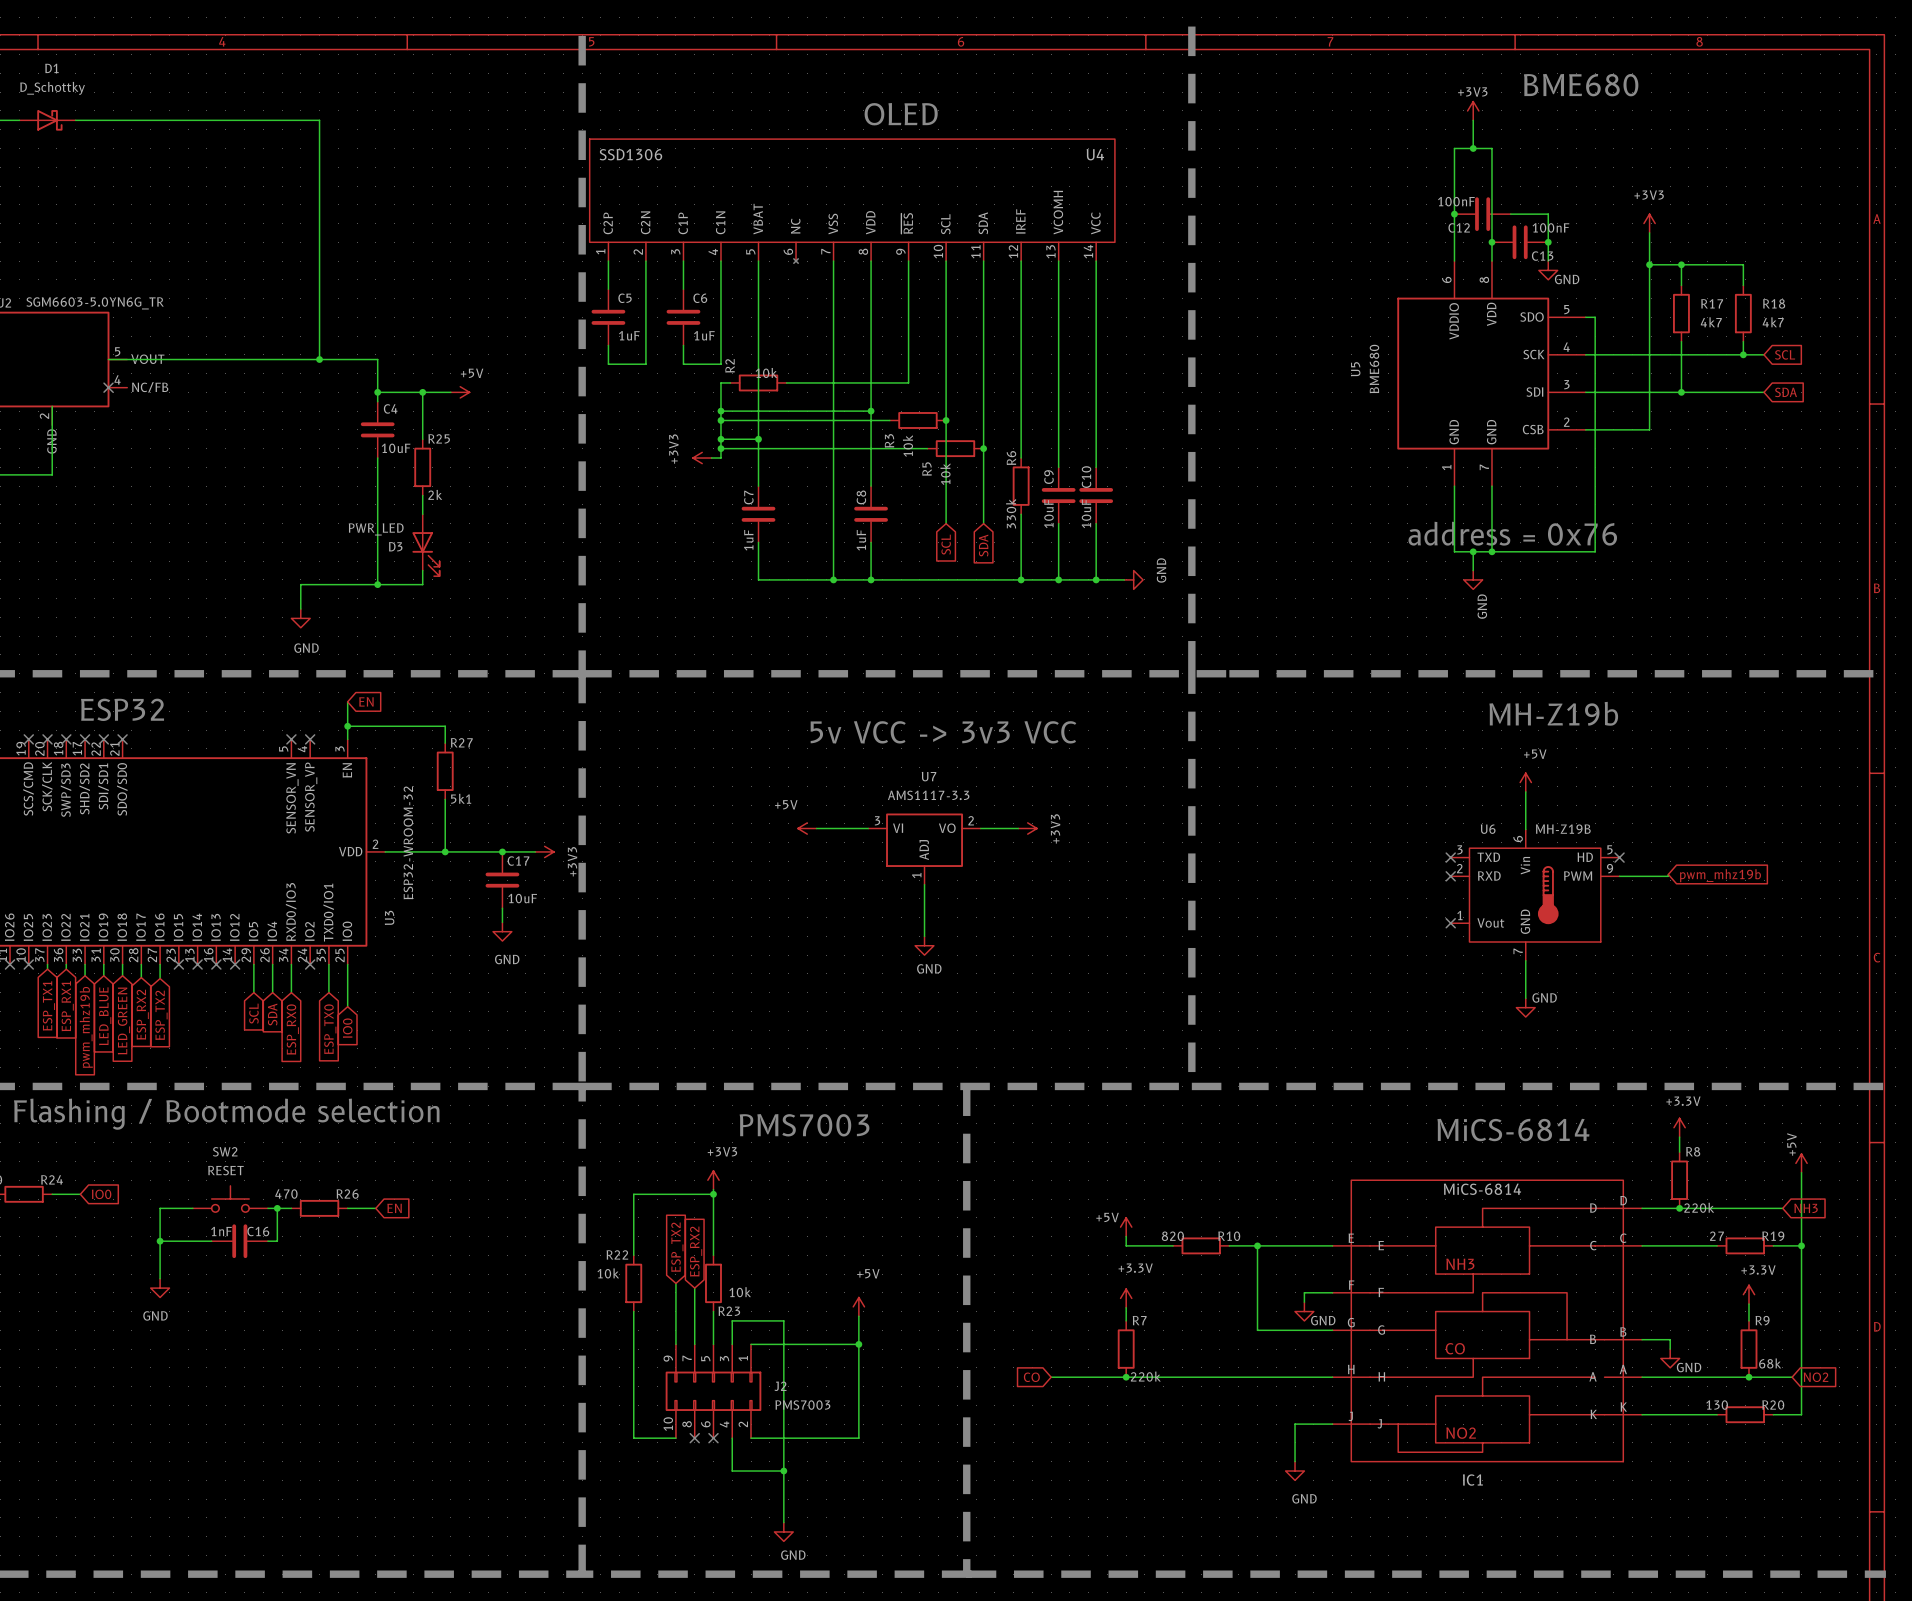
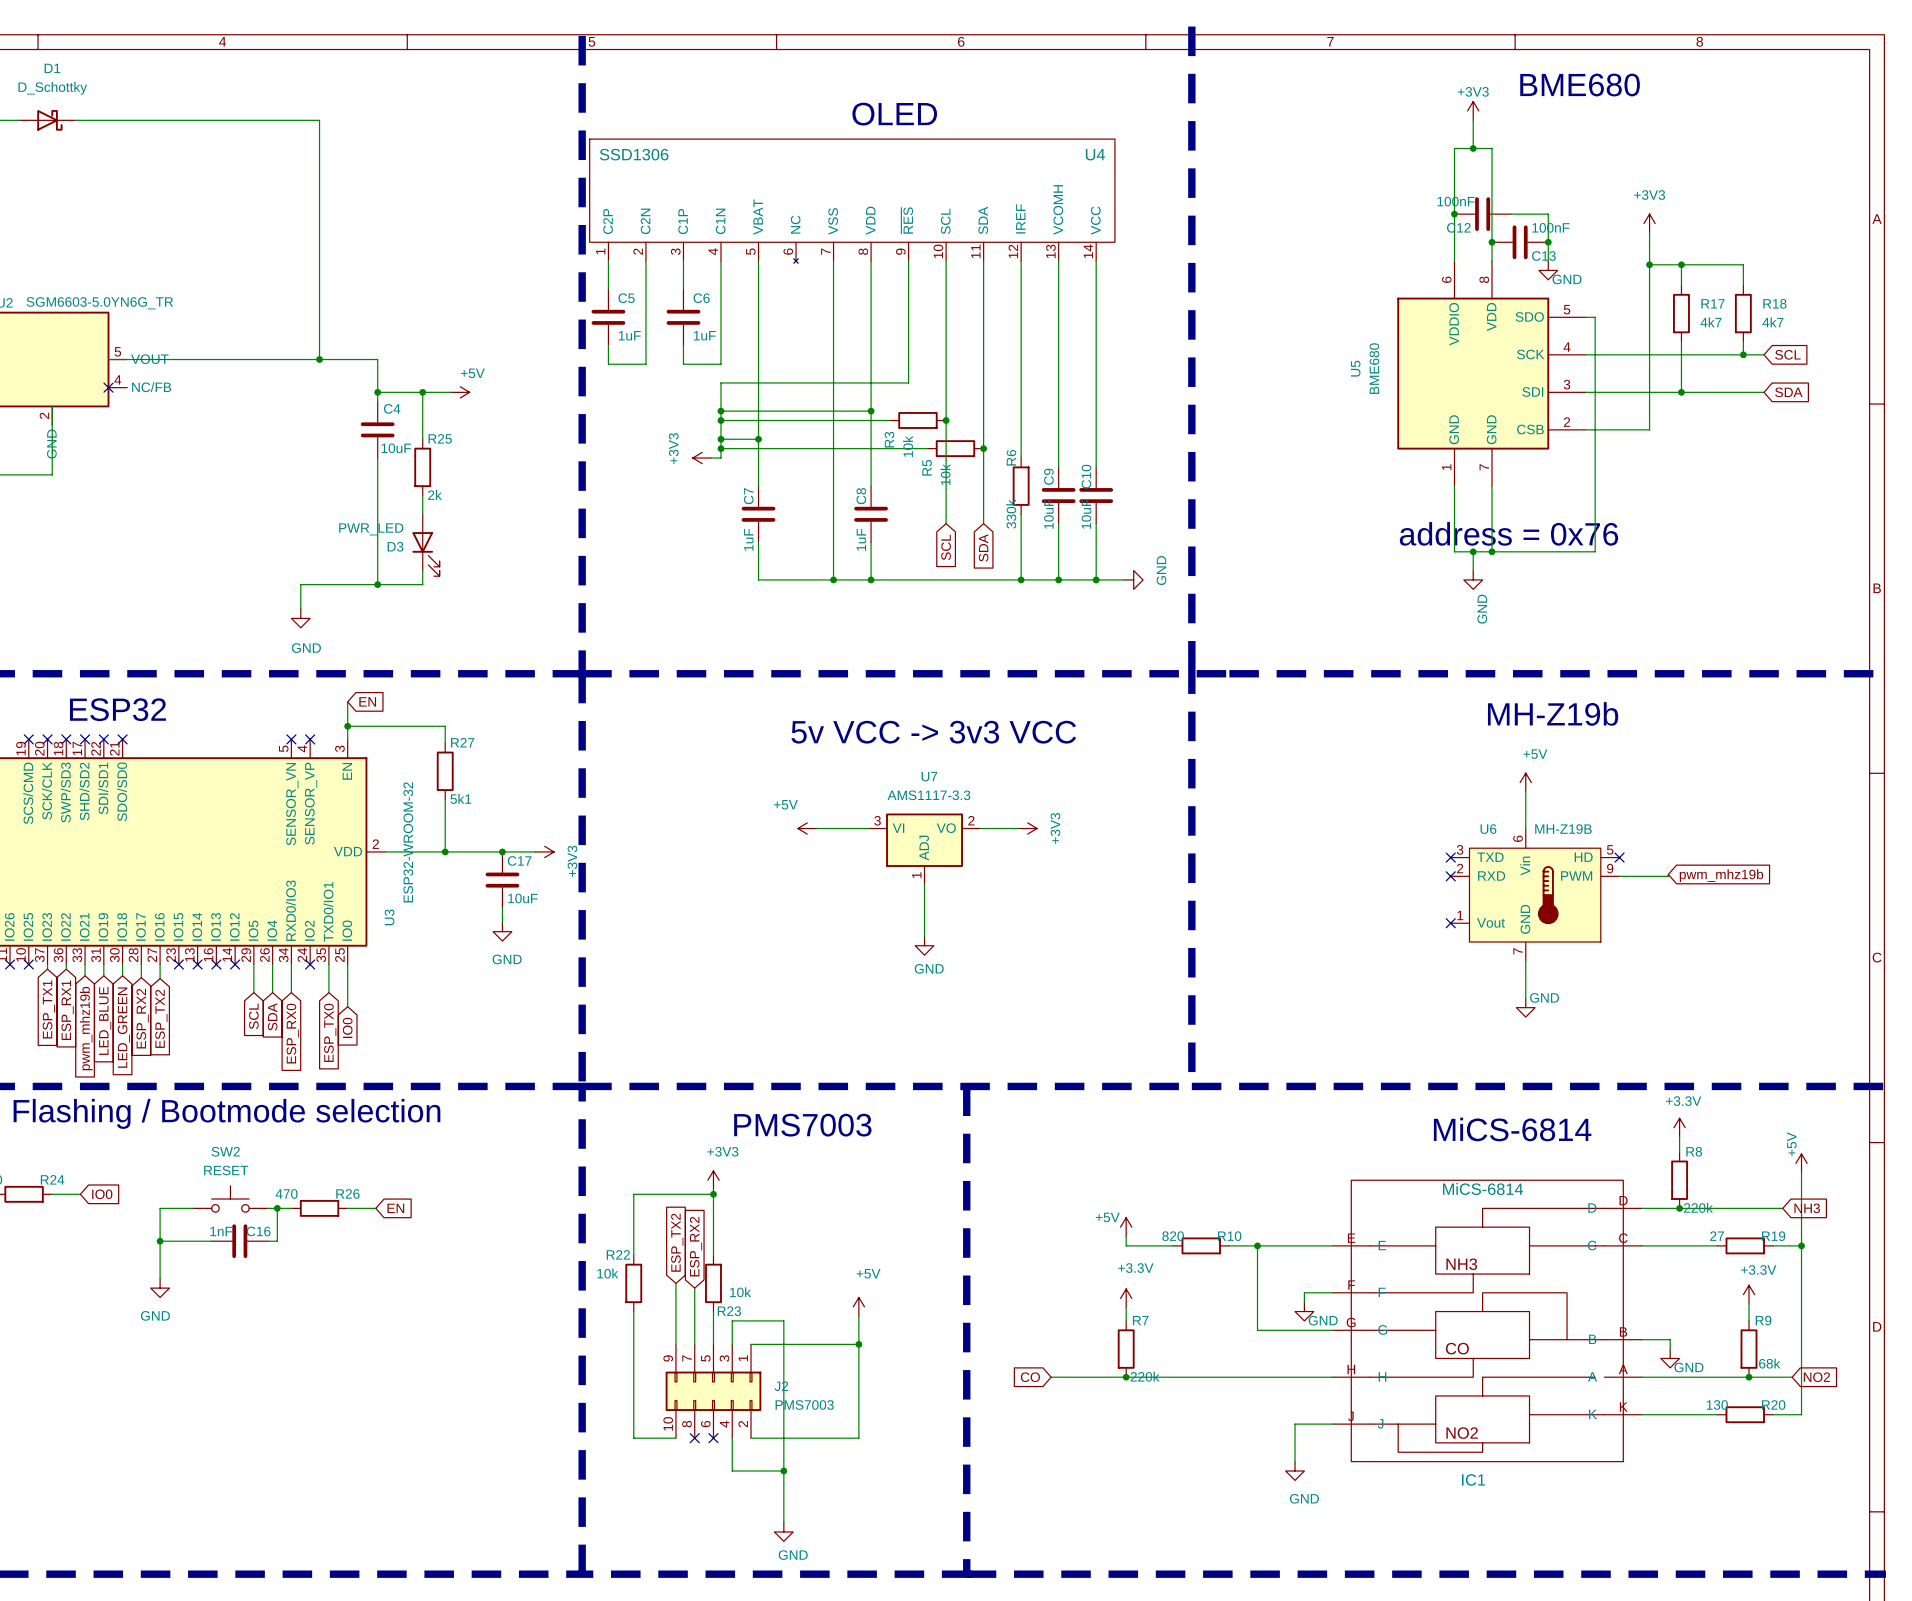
wire: none -> (730, 382) (786, 382)
R2: 10k (758, 382) -> none

